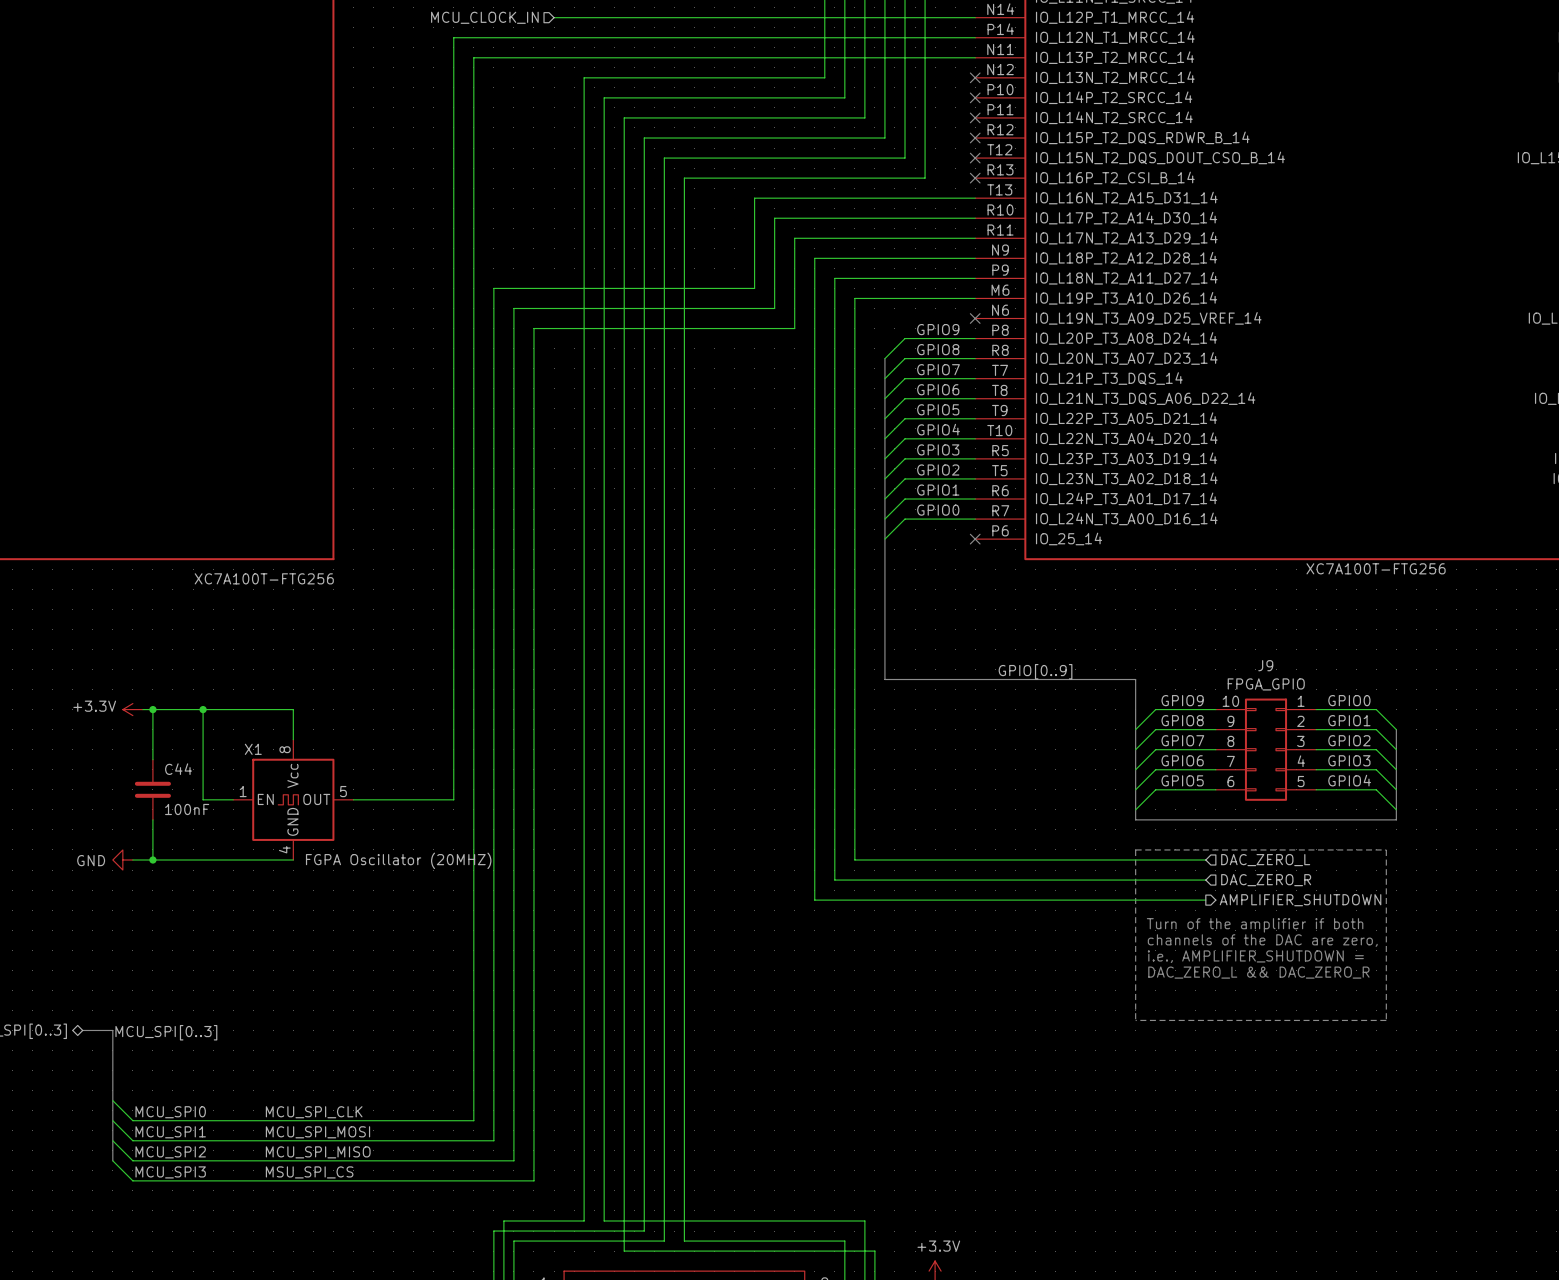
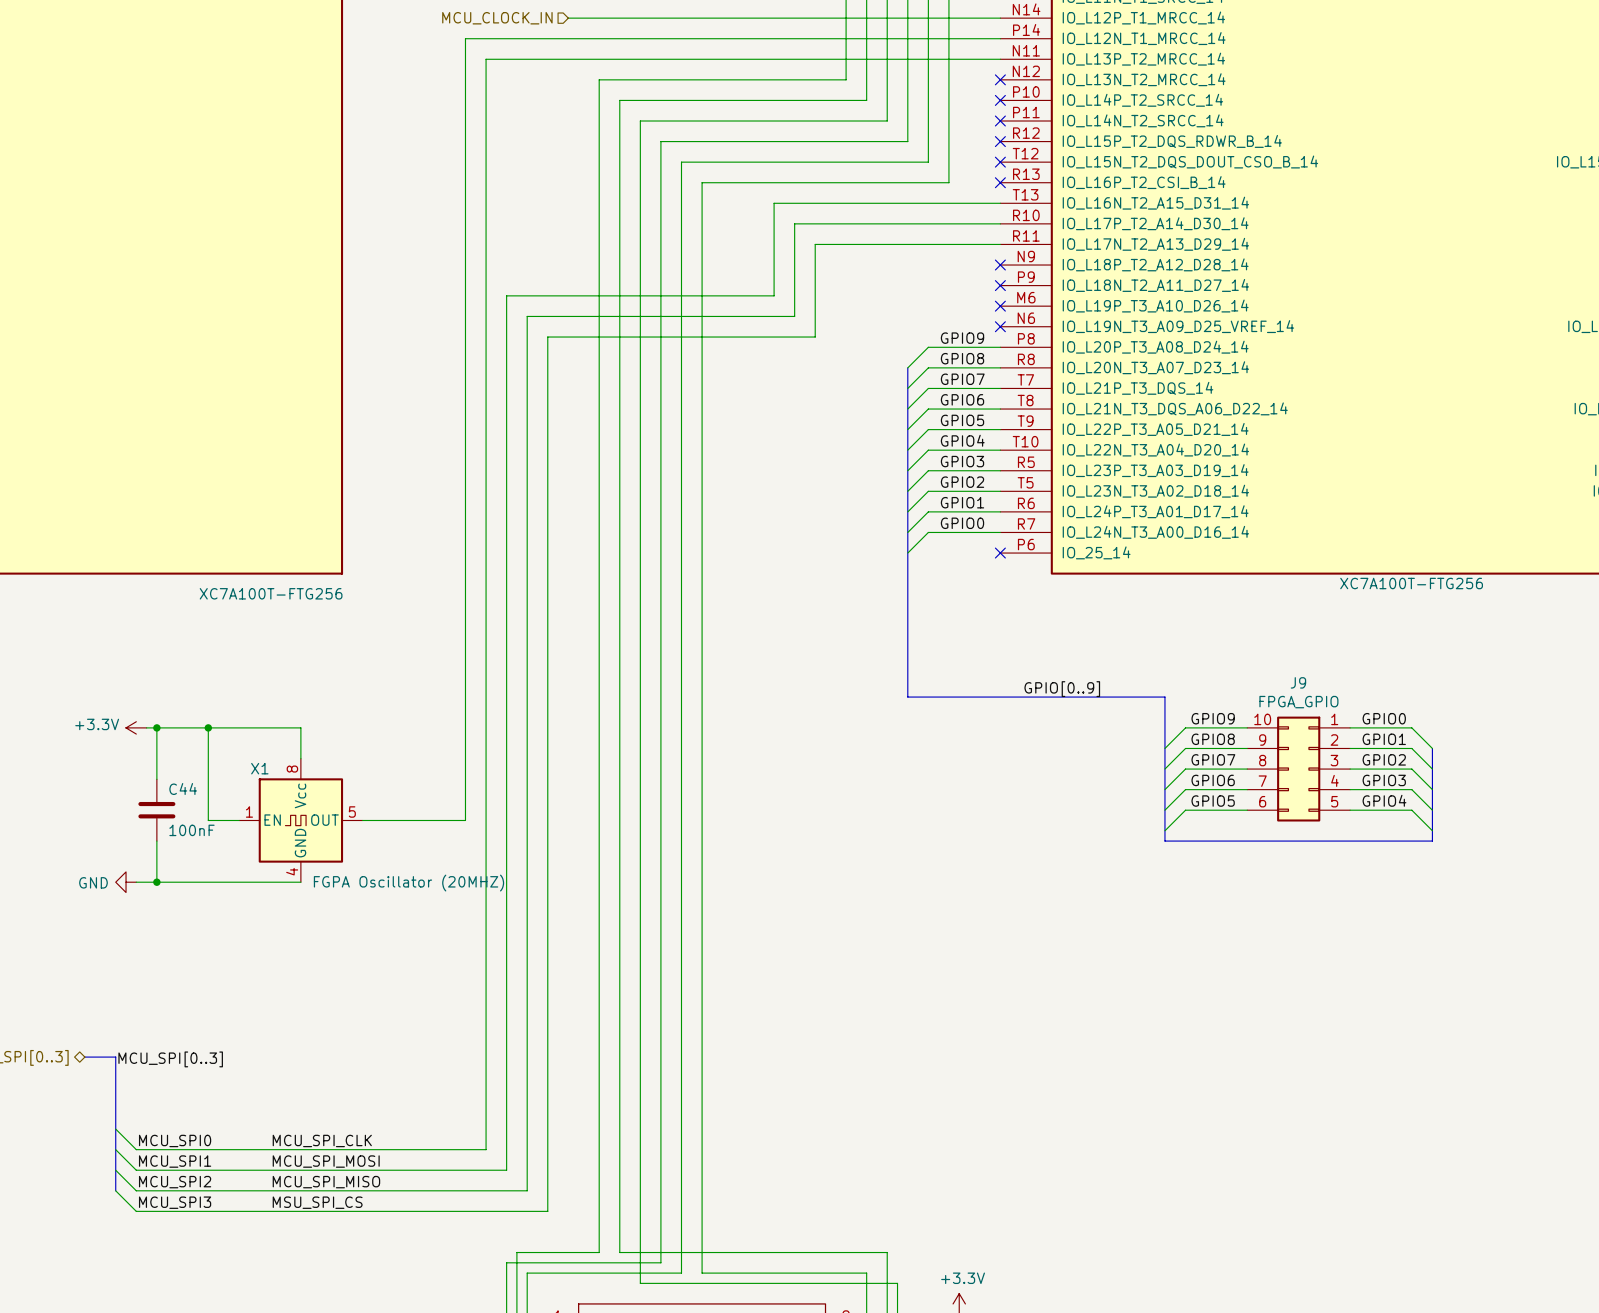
wire: (975, 258) (814, 258) (814, 900) (1205, 900) -> none
no-connect mark: none -> (1000, 265)
wire: (975, 278) (834, 278) (834, 880) (1205, 880) -> none
no-connect mark: none -> (1000, 285)
wire: (975, 298) (854, 298) (854, 860) (1205, 860) -> none
no-connect mark: none -> (1000, 306)
line: (1135, 849) (1386, 849) (1386, 1020) (1135, 1020) (1135, 849) -> none
hierarchical label: DAC_ZERO_L (1265, 860) -> none
hierarchical label: DAC_ZERO_R (1266, 880) -> none
hierarchical label: AMPLIFIER_SHUTDOWN (1300, 900) -> none
text: Turn of the amplifier if both (1255, 925) -> none
text: channels of the DAC are zero, (1262, 940) -> none
text: i.e., AMPLIFIER_SHUTDOWN = (1255, 956) -> none
text: DAC_ZERO_L && DAC_ZERO_R (1258, 972) -> none

